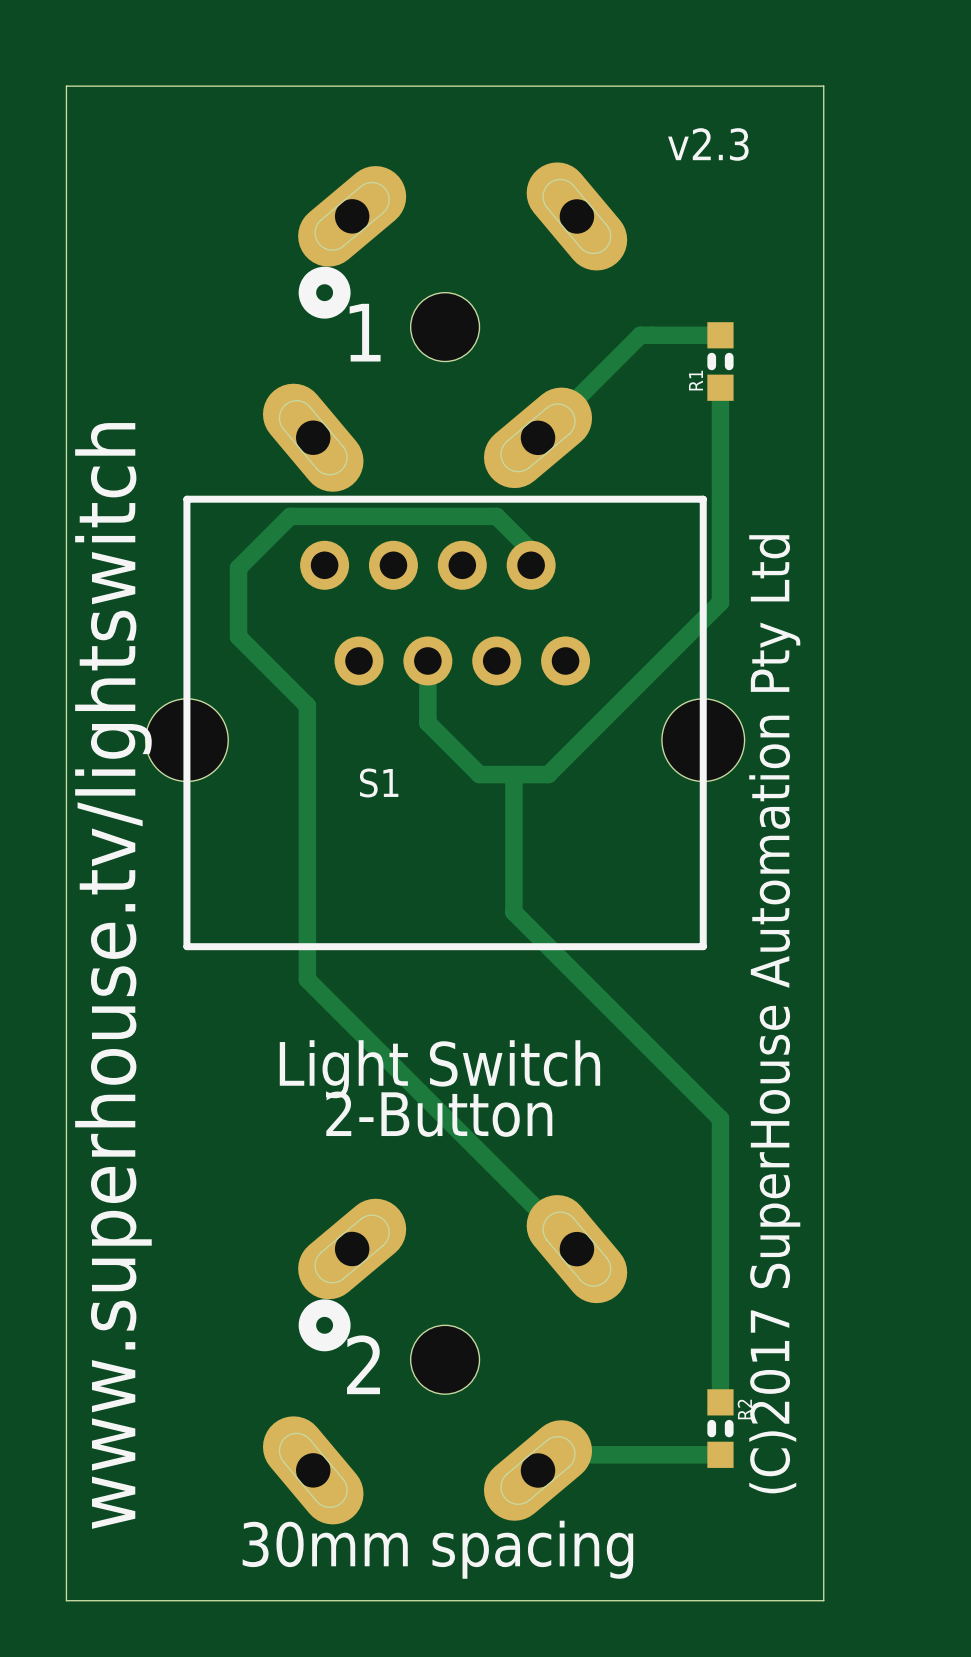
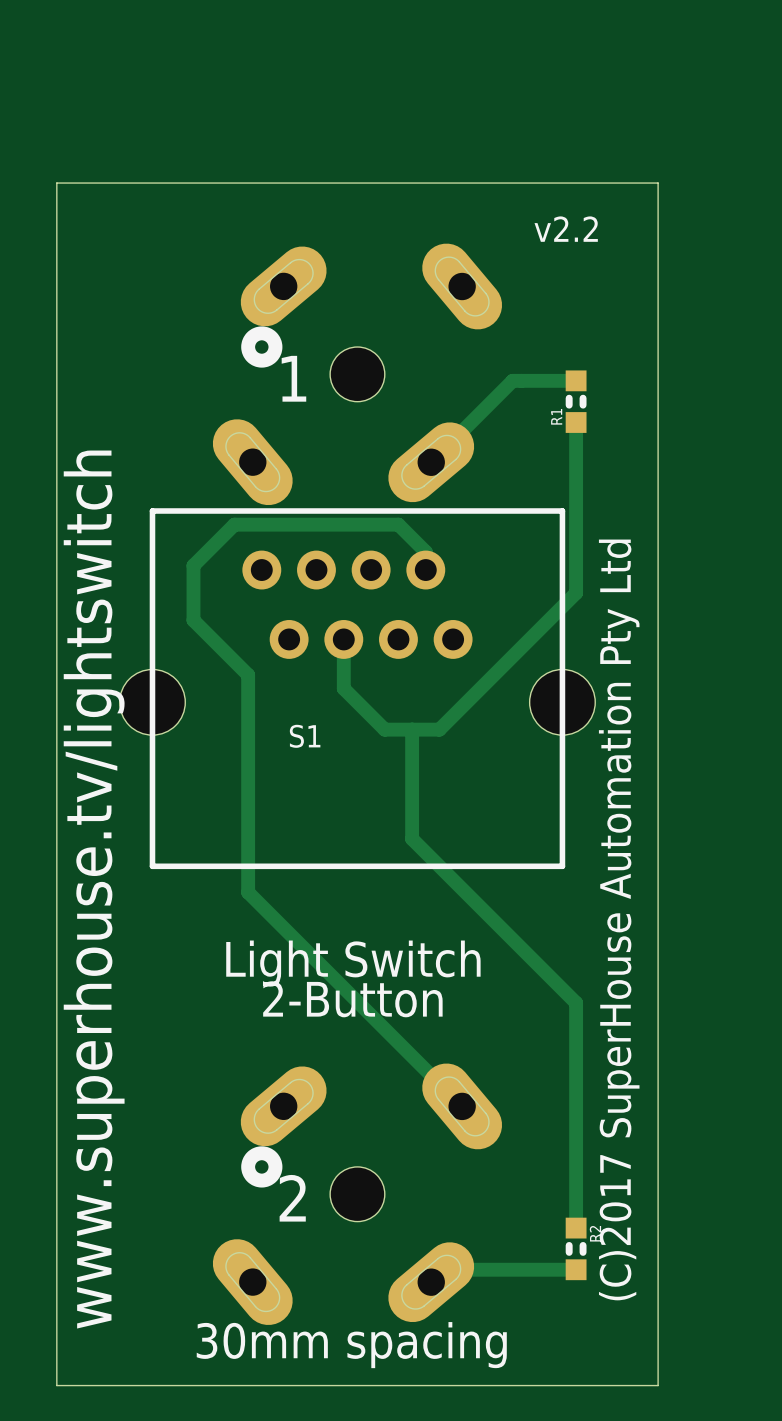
text: v2.3 (708, 144) -> v2.2 (566, 229)
S1 footprint: [145, 495, 745, 951] -> [119, 508, 596, 870]

